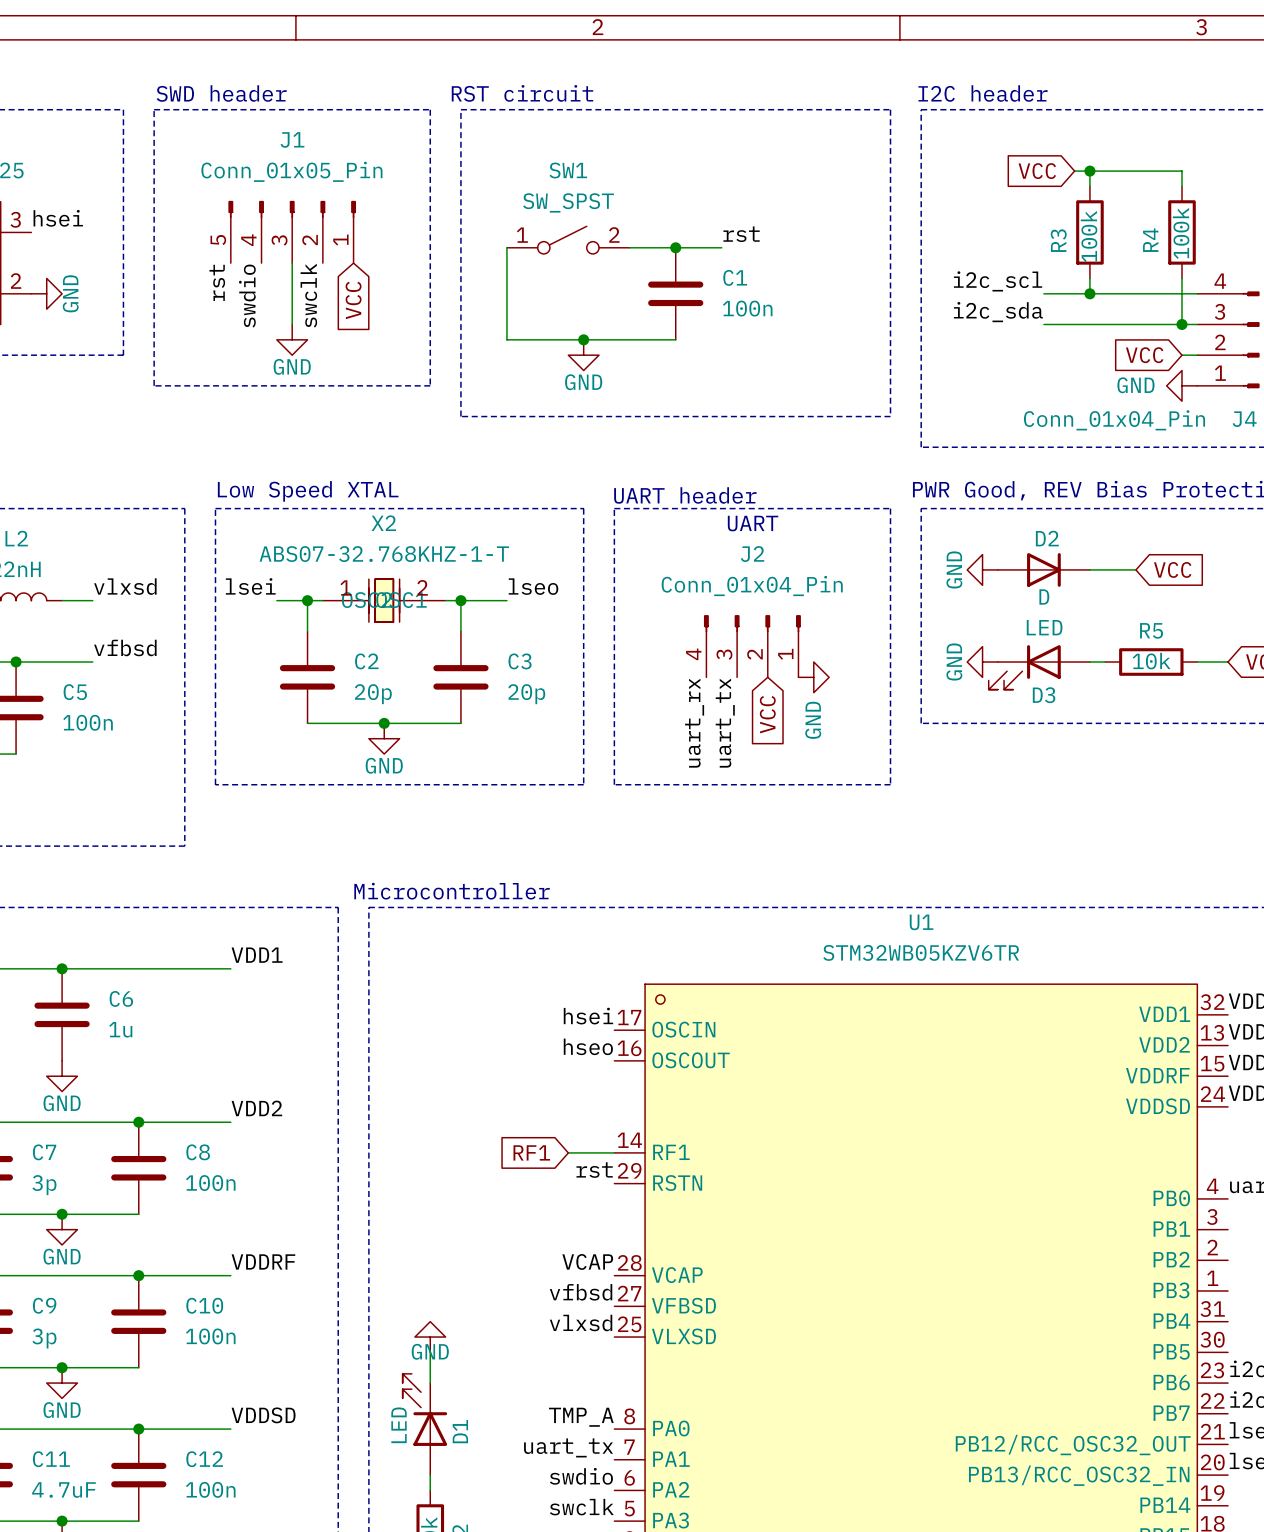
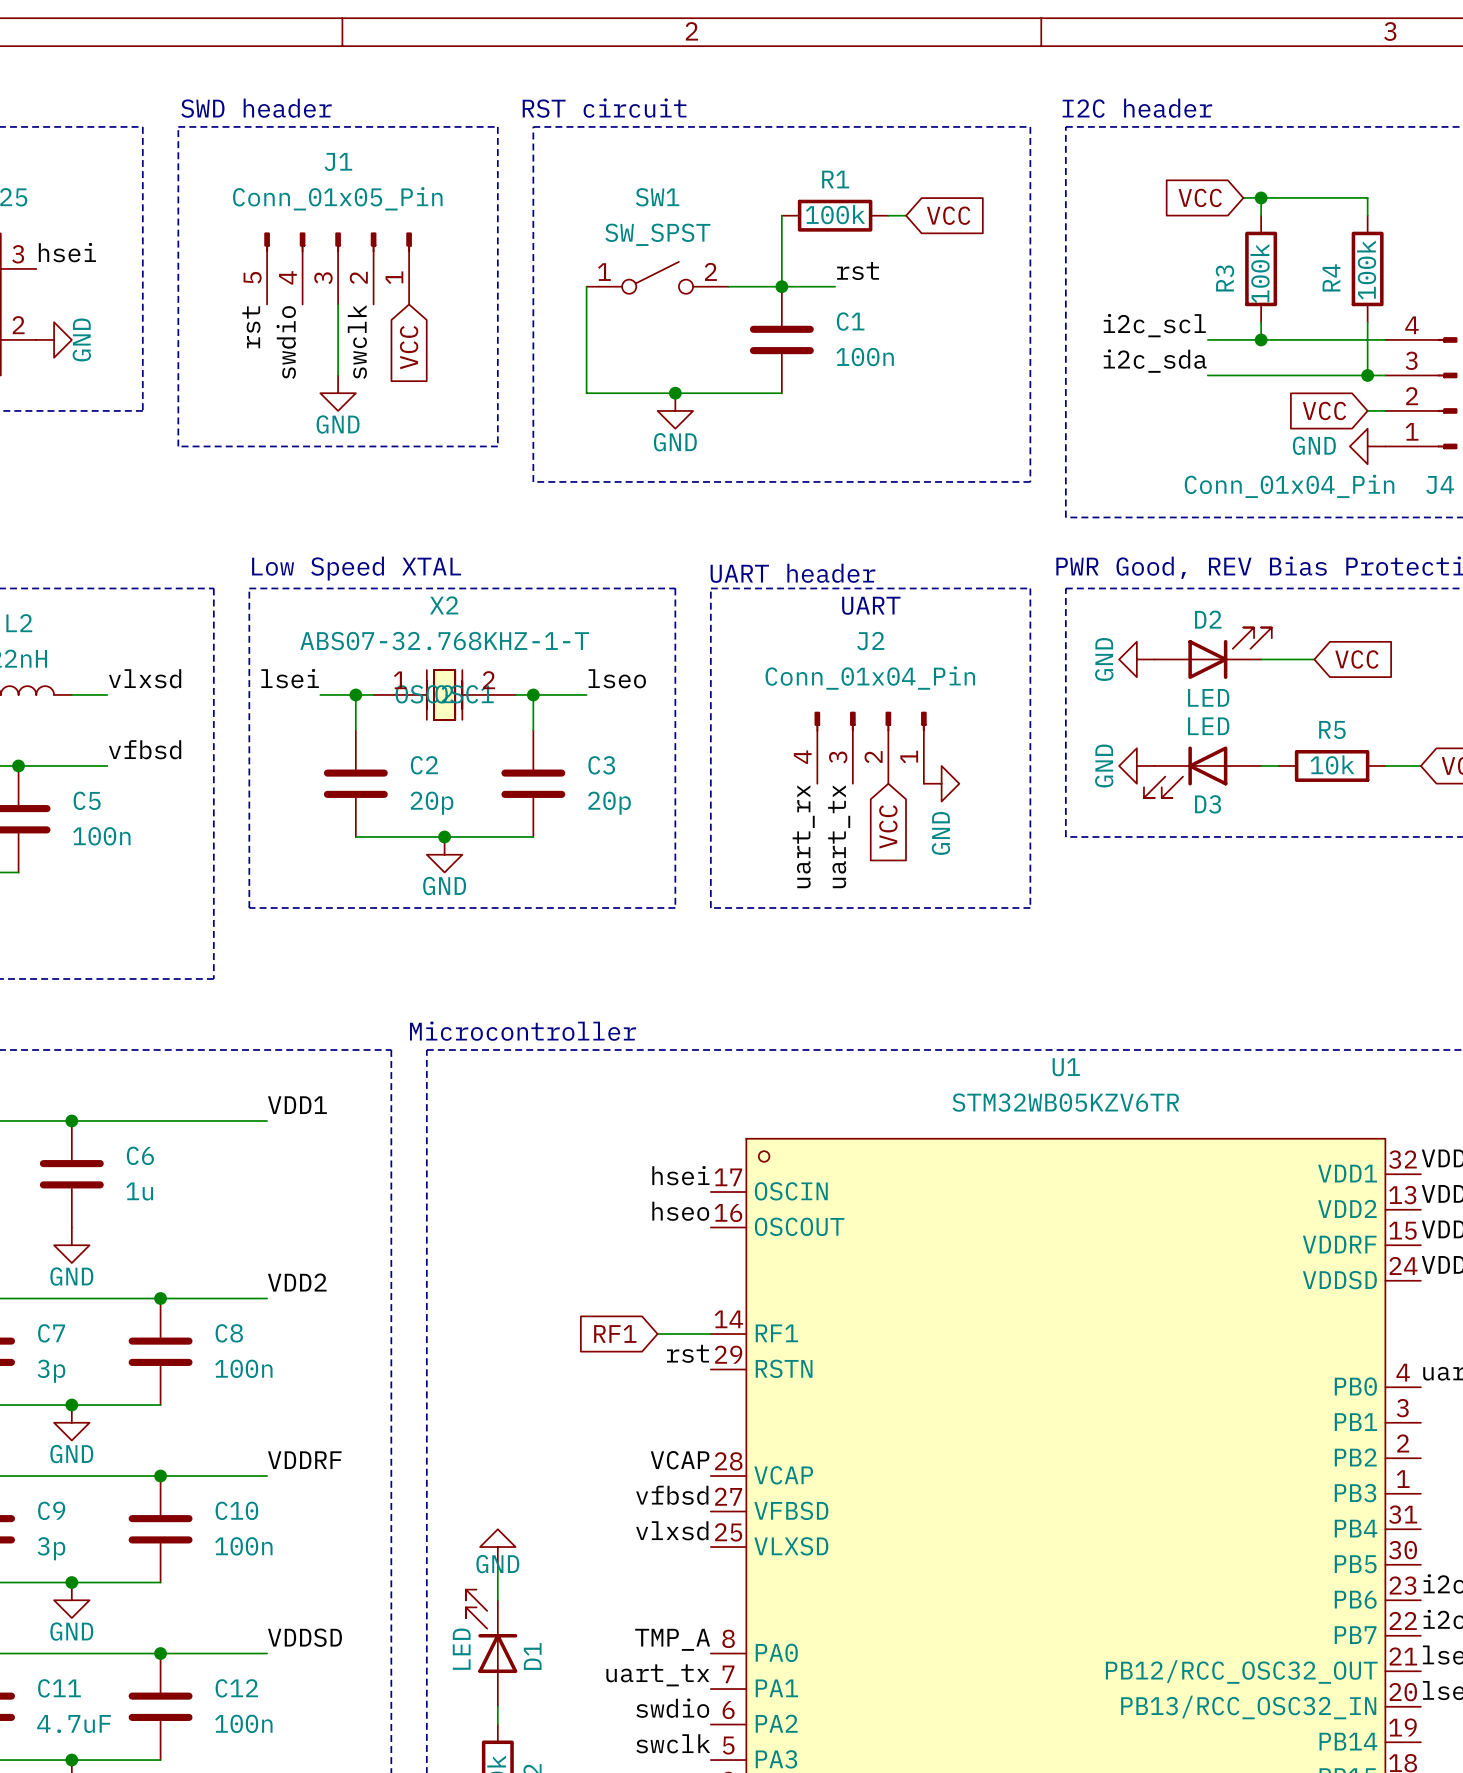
wire: none -> (781, 215) (781, 286)
R1: none -> 100k (835, 215)
wire: none -> (888, 215) (906, 215)
global label: none -> VCC (948, 215)
D2 symbol: [997, 553, 1090, 587] -> [1154, 627, 1272, 680]
D2 value: D (1044, 597) -> LED (1208, 697)

